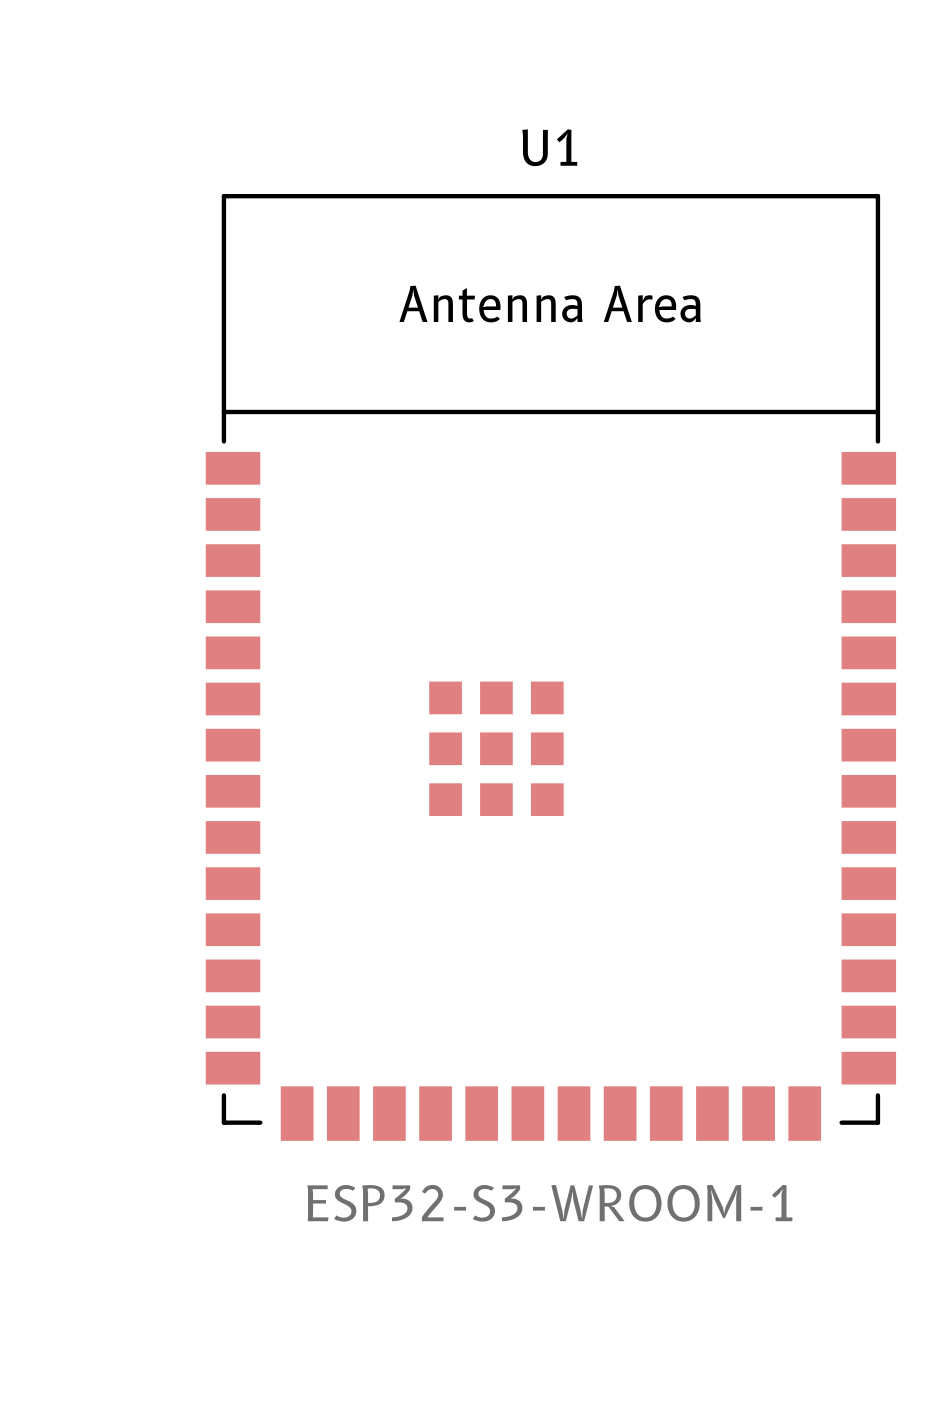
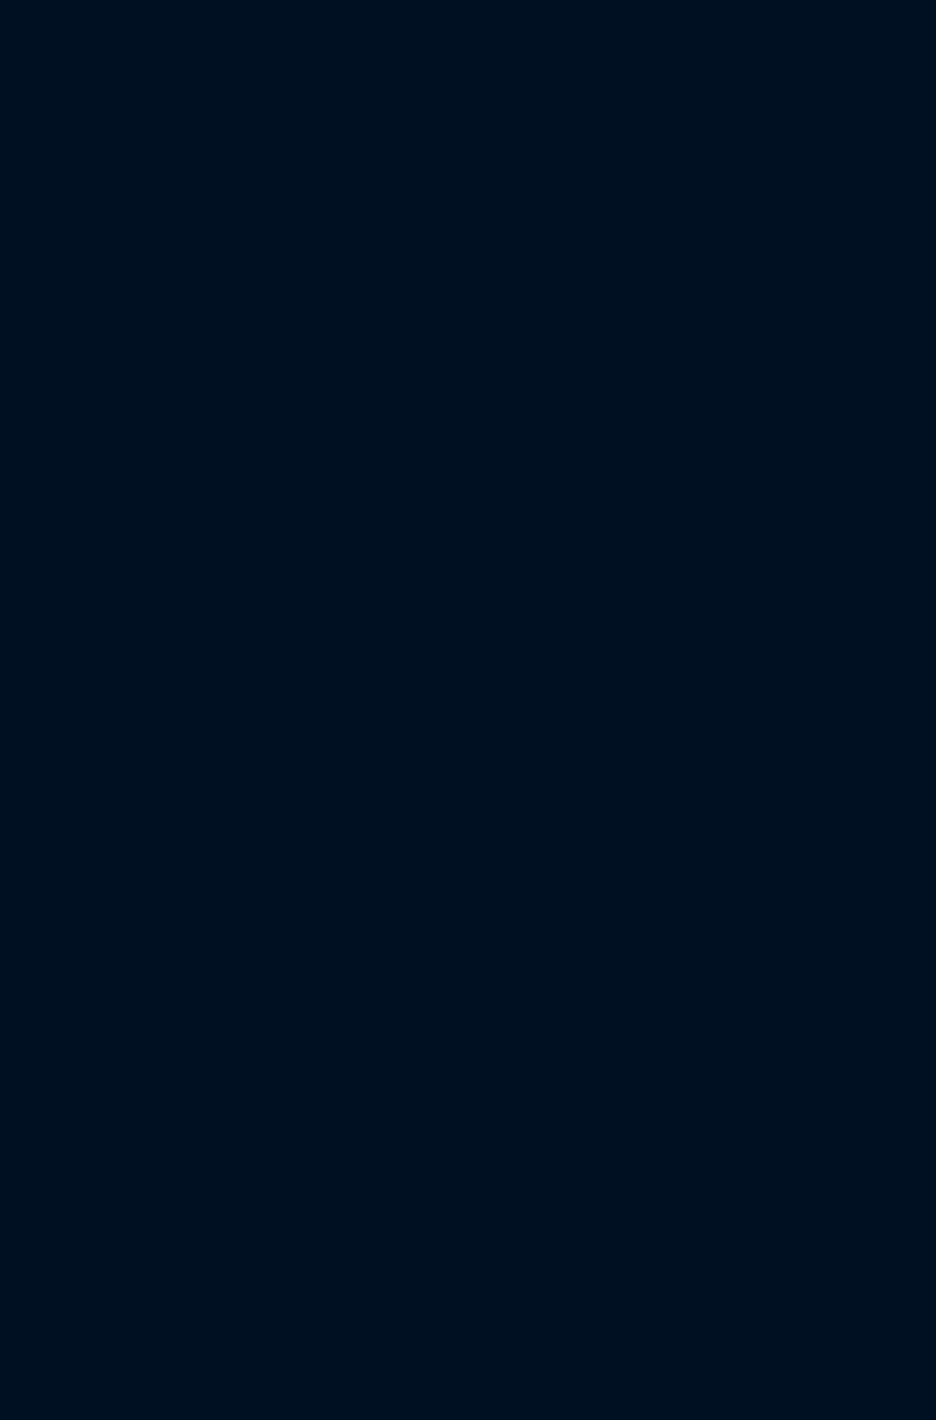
U1: ESP32-S3-WROOM-1 (550, 667) -> none

